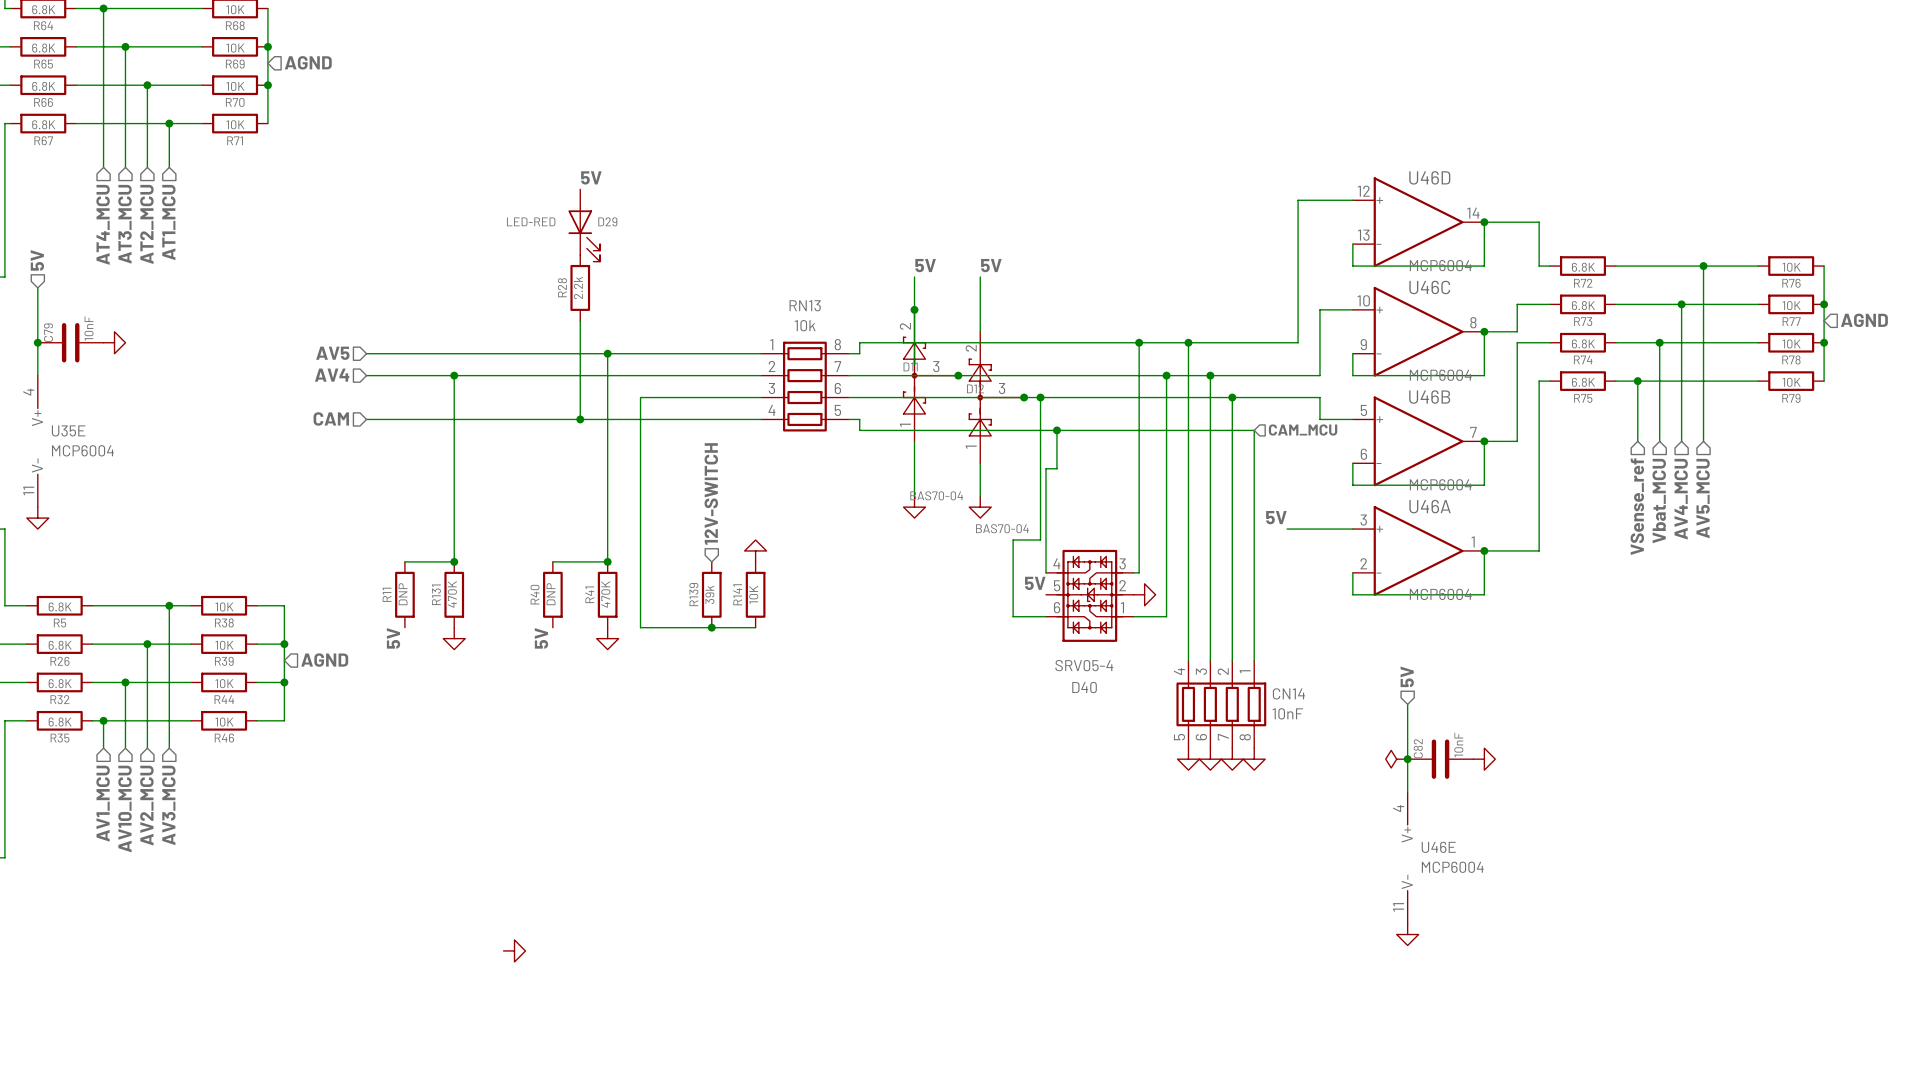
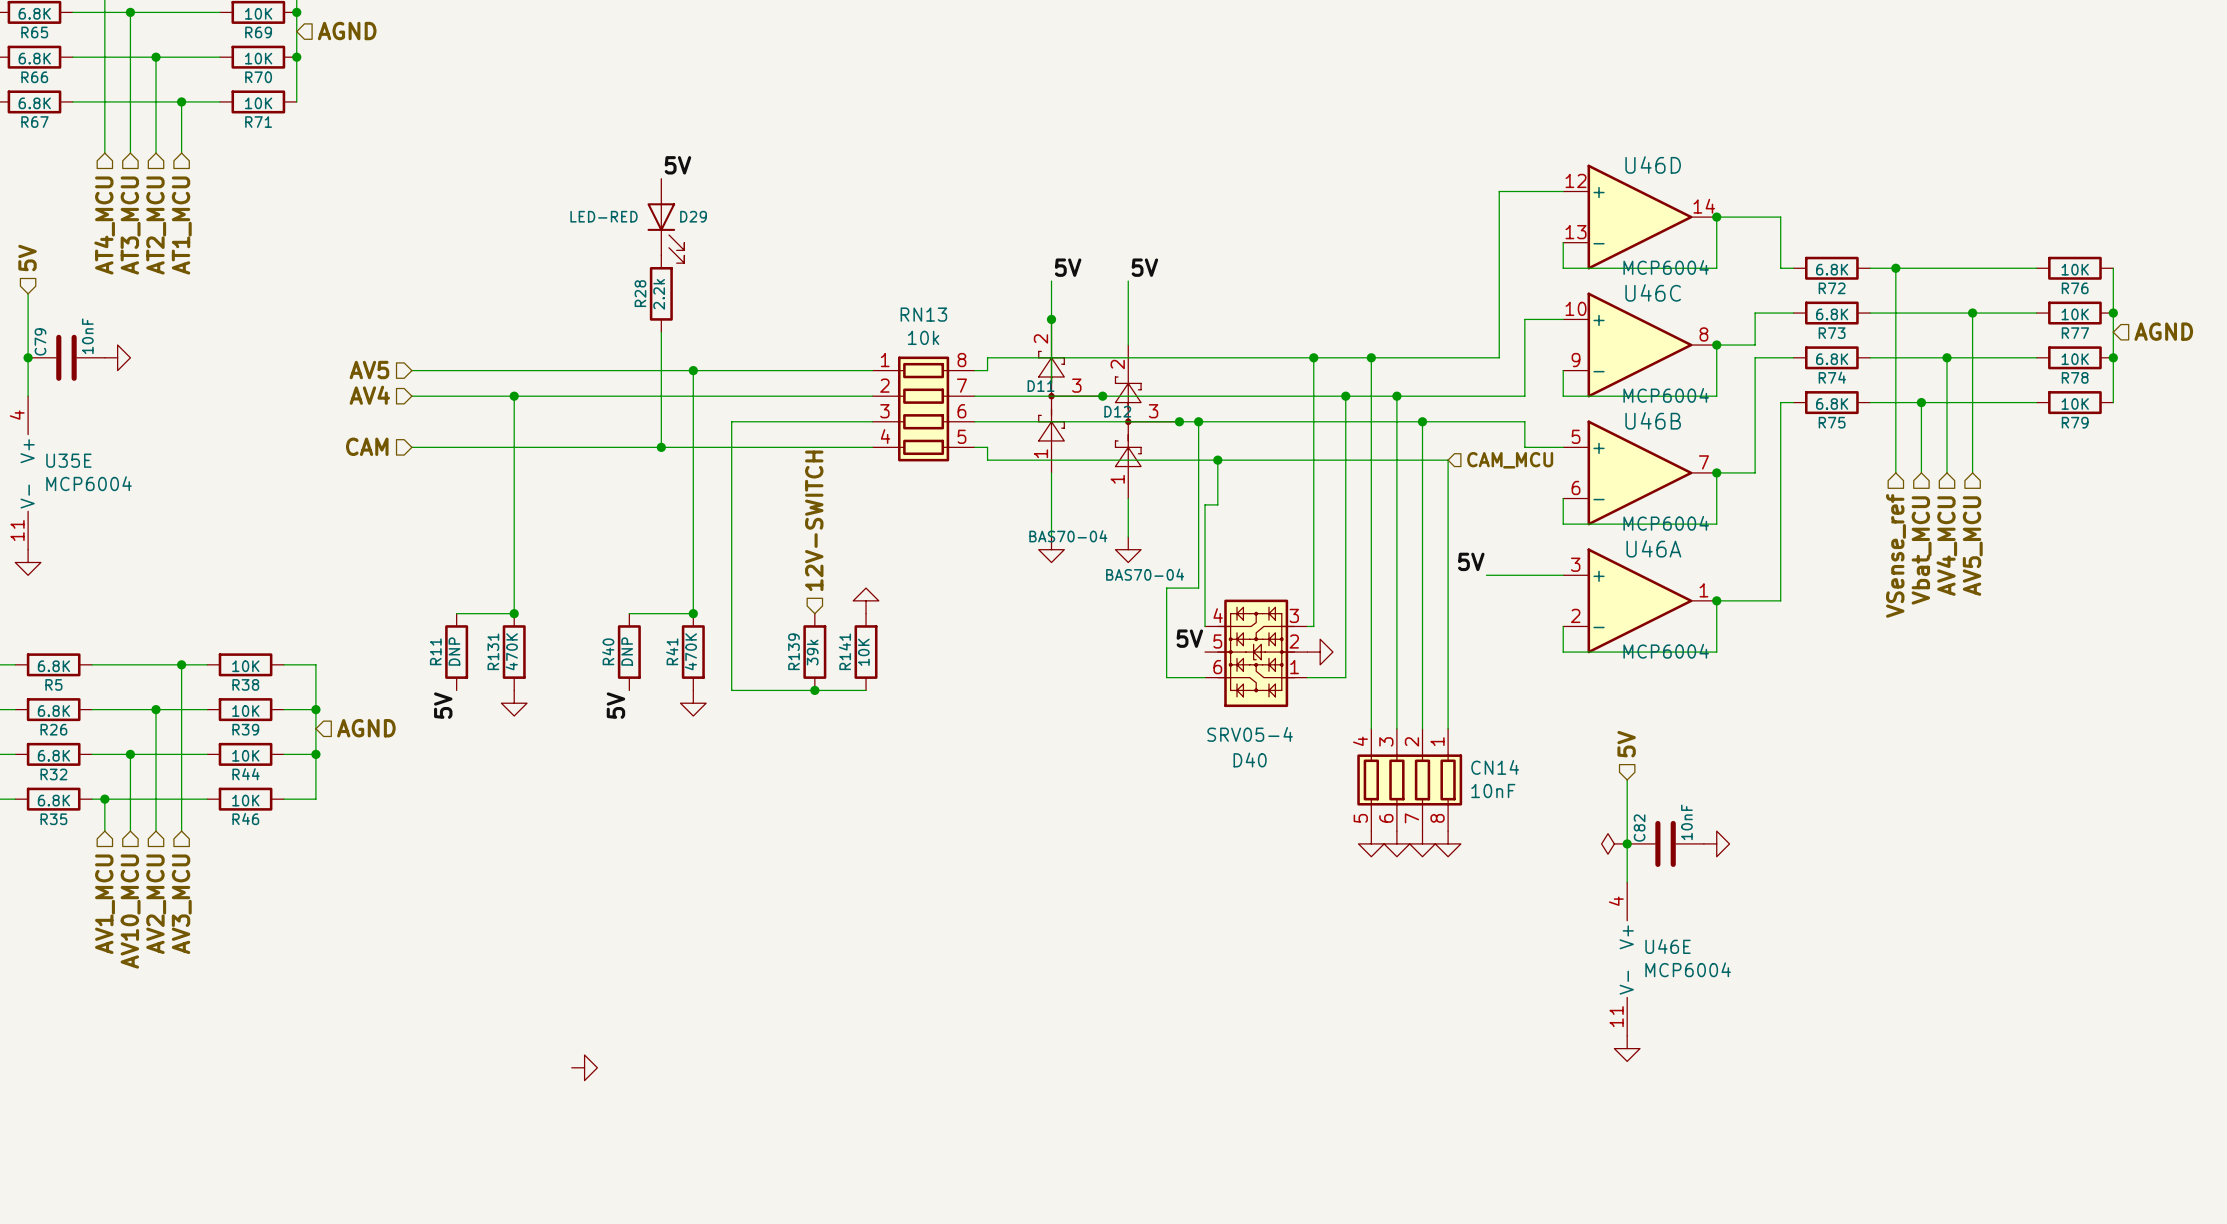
wire: none -> (1895, 268) (1895, 402)
junction: none -> (1895, 268)
wire: (1703, 266) (1703, 304) -> none
junction: (1703, 266) -> none
wire: (1681, 304) (1681, 342) -> none
junction: (1681, 304) -> none
junction: none -> (1972, 313)
wire: (1659, 342) (1659, 381) -> none
junction: (1659, 342) -> none
junction: none -> (1947, 357)
junction: (1637, 381) -> none
junction: none -> (1921, 402)

